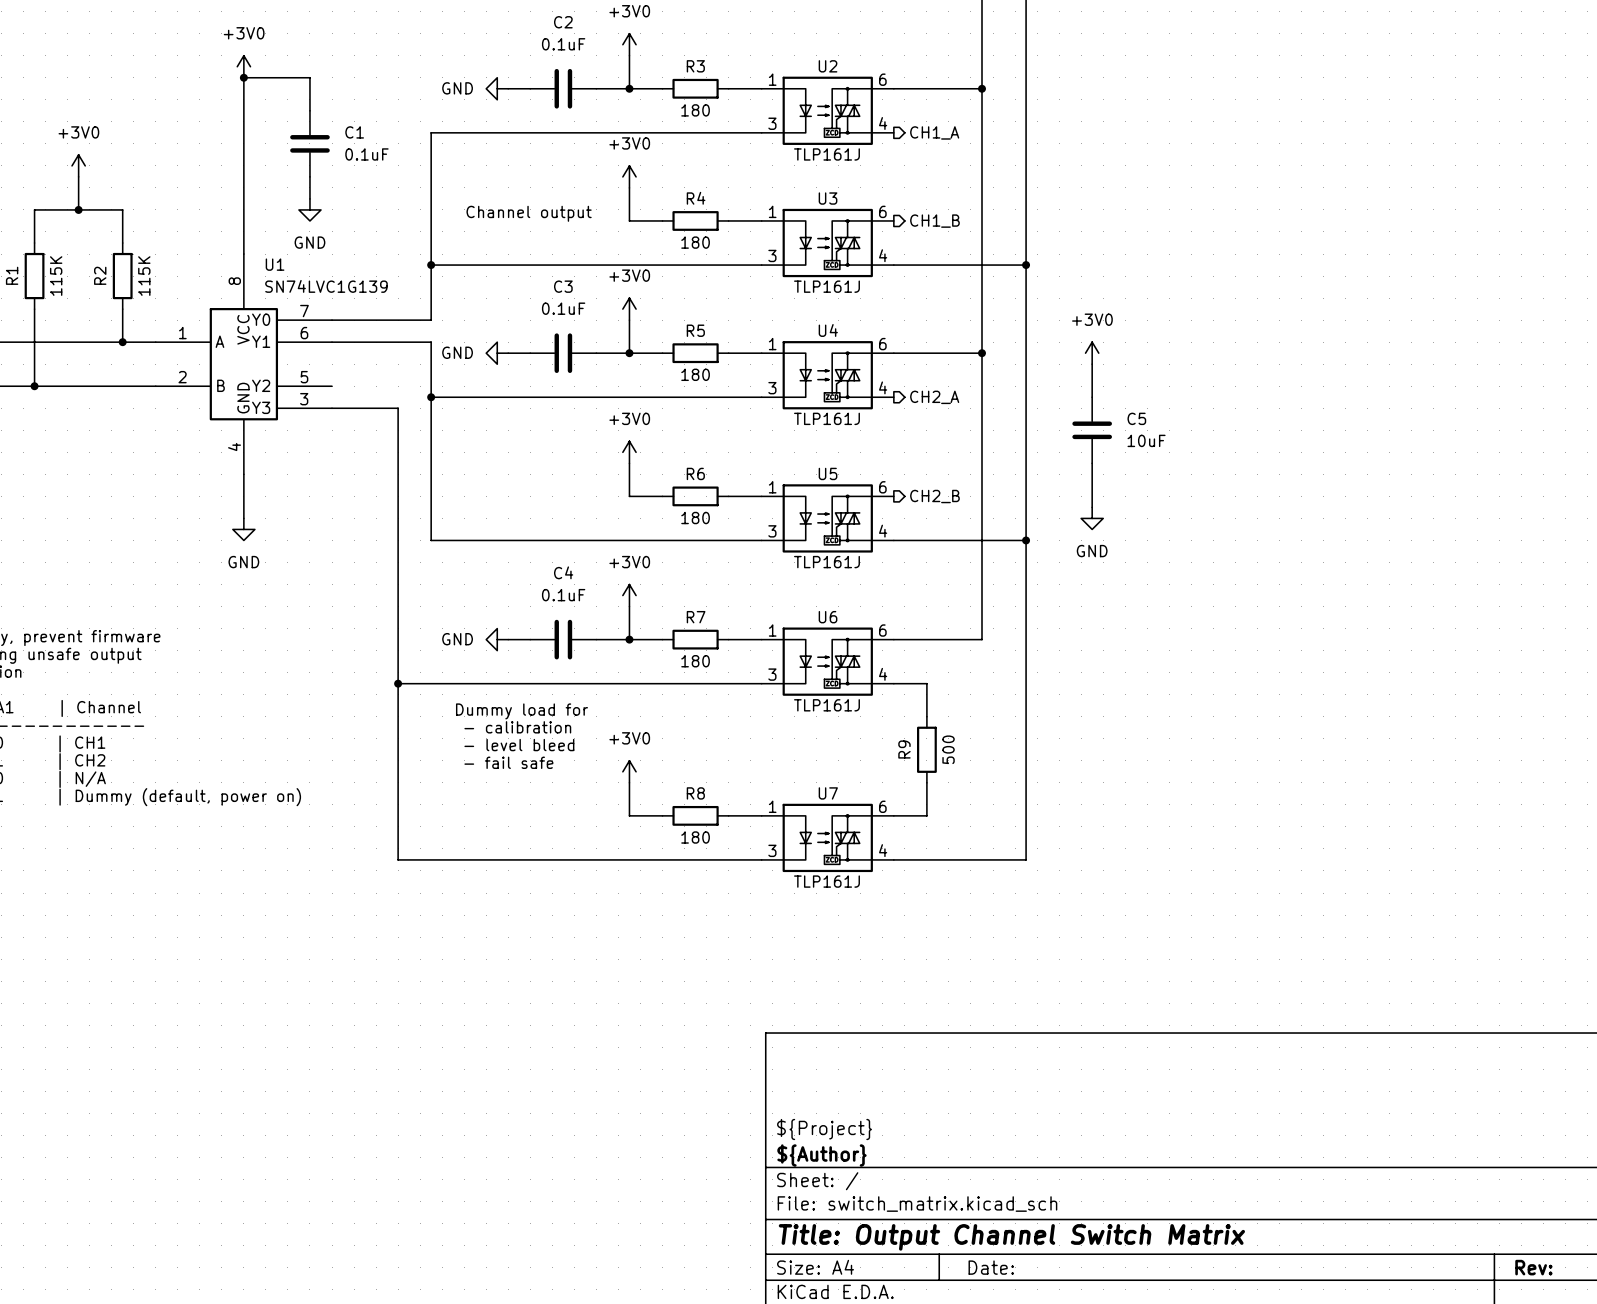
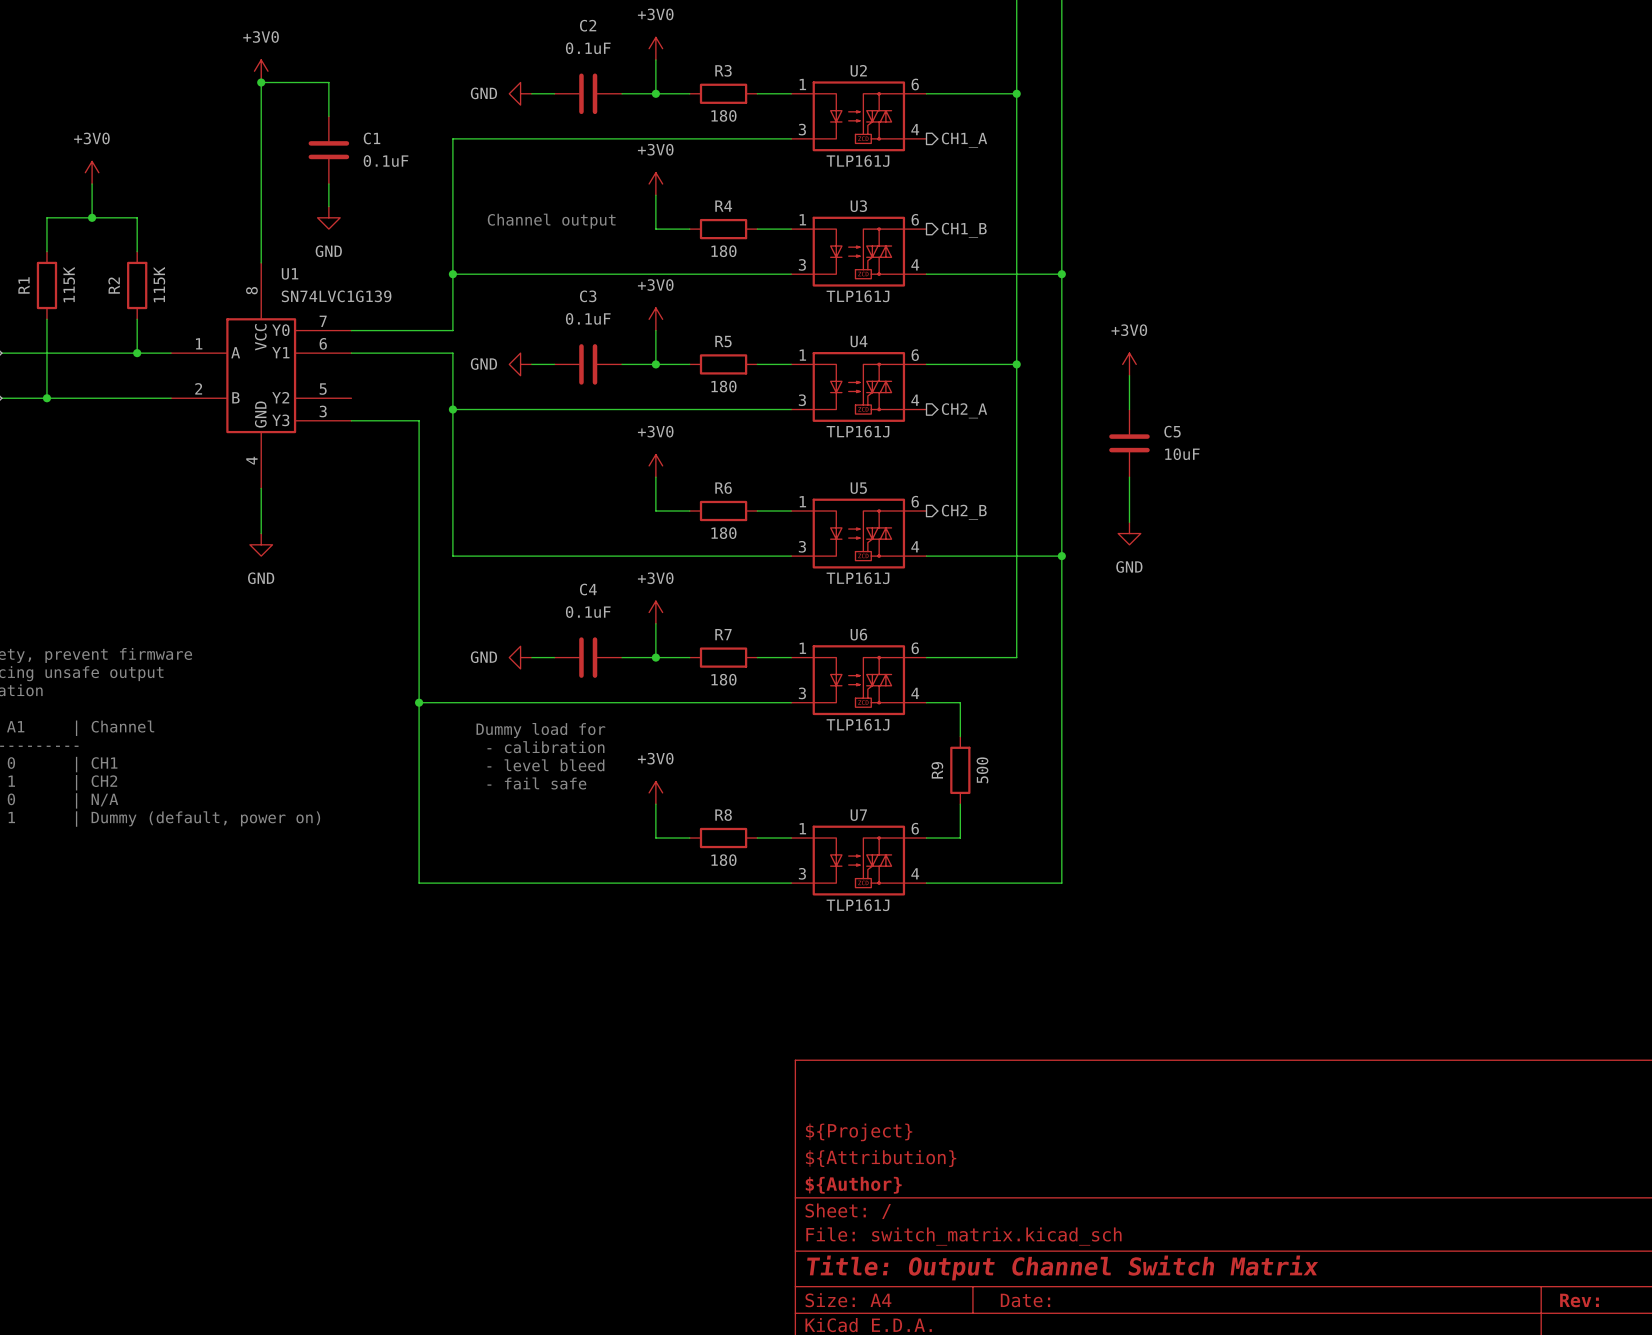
title block: none -> ${Project} (859, 1132)
title block: ${Project} (824, 1129) -> ${Attribution} (881, 1158)

